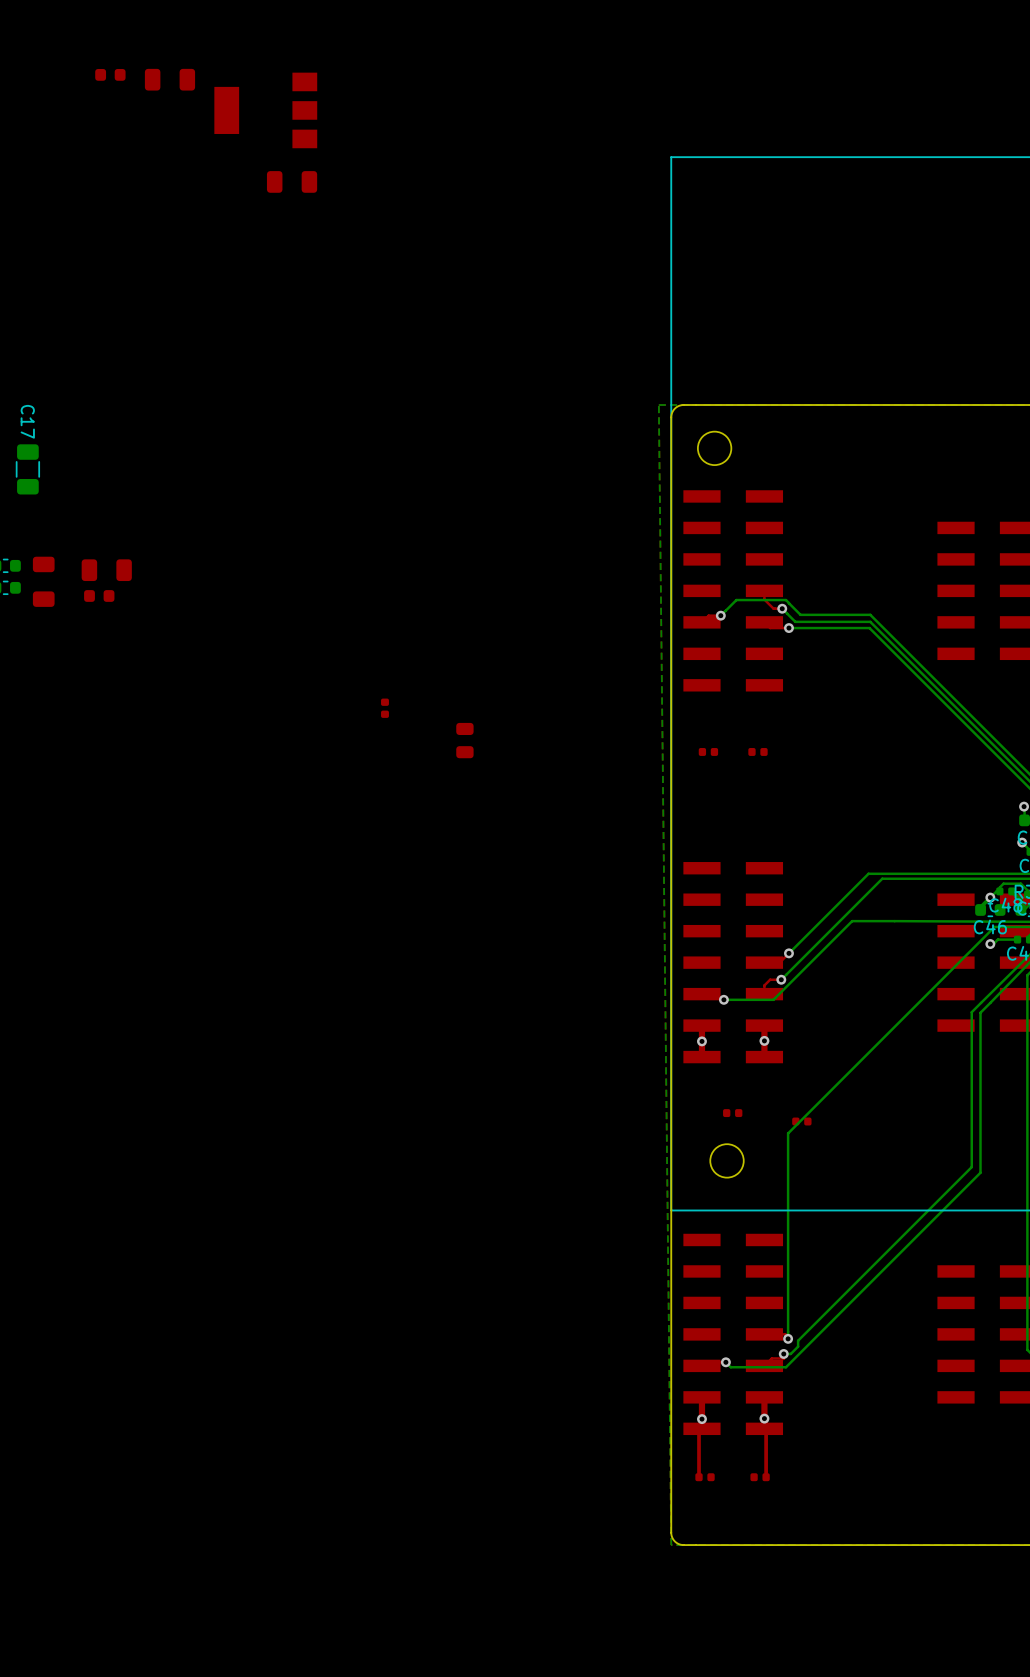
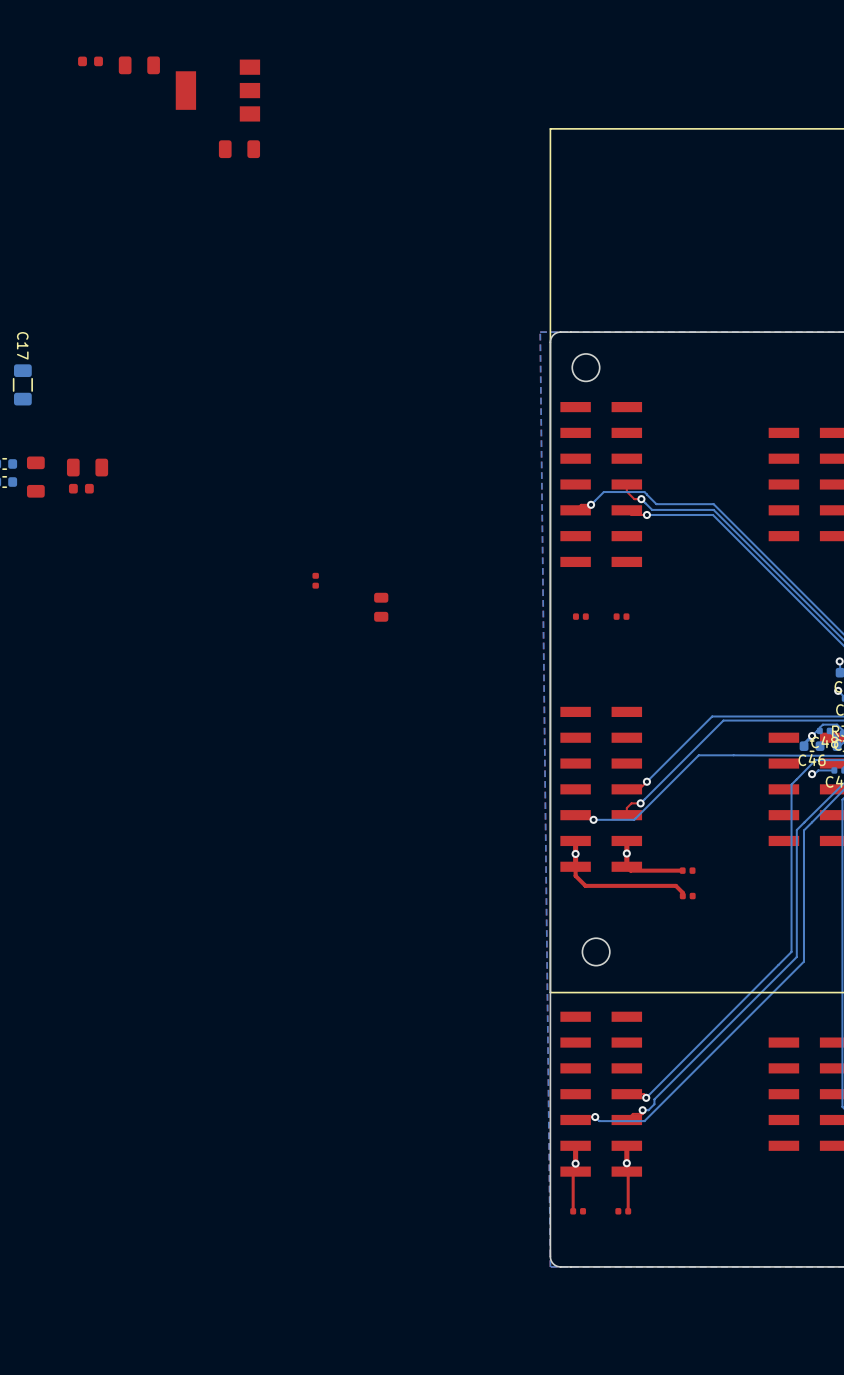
bottom track: (994, 926) (788, 1133) (788, 1338) -> (815, 760) (791, 784) (791, 951) (646, 1097)
top track: none -> (575, 866) (575, 875) (585, 885) (675, 885) (682, 892) (682, 896)
top track: none -> (626, 866) (630, 870) (682, 870)
part: none -> (687, 870)
part: none -> (687, 896)
part: (732, 1113) -> none
part: (801, 1121) -> none

